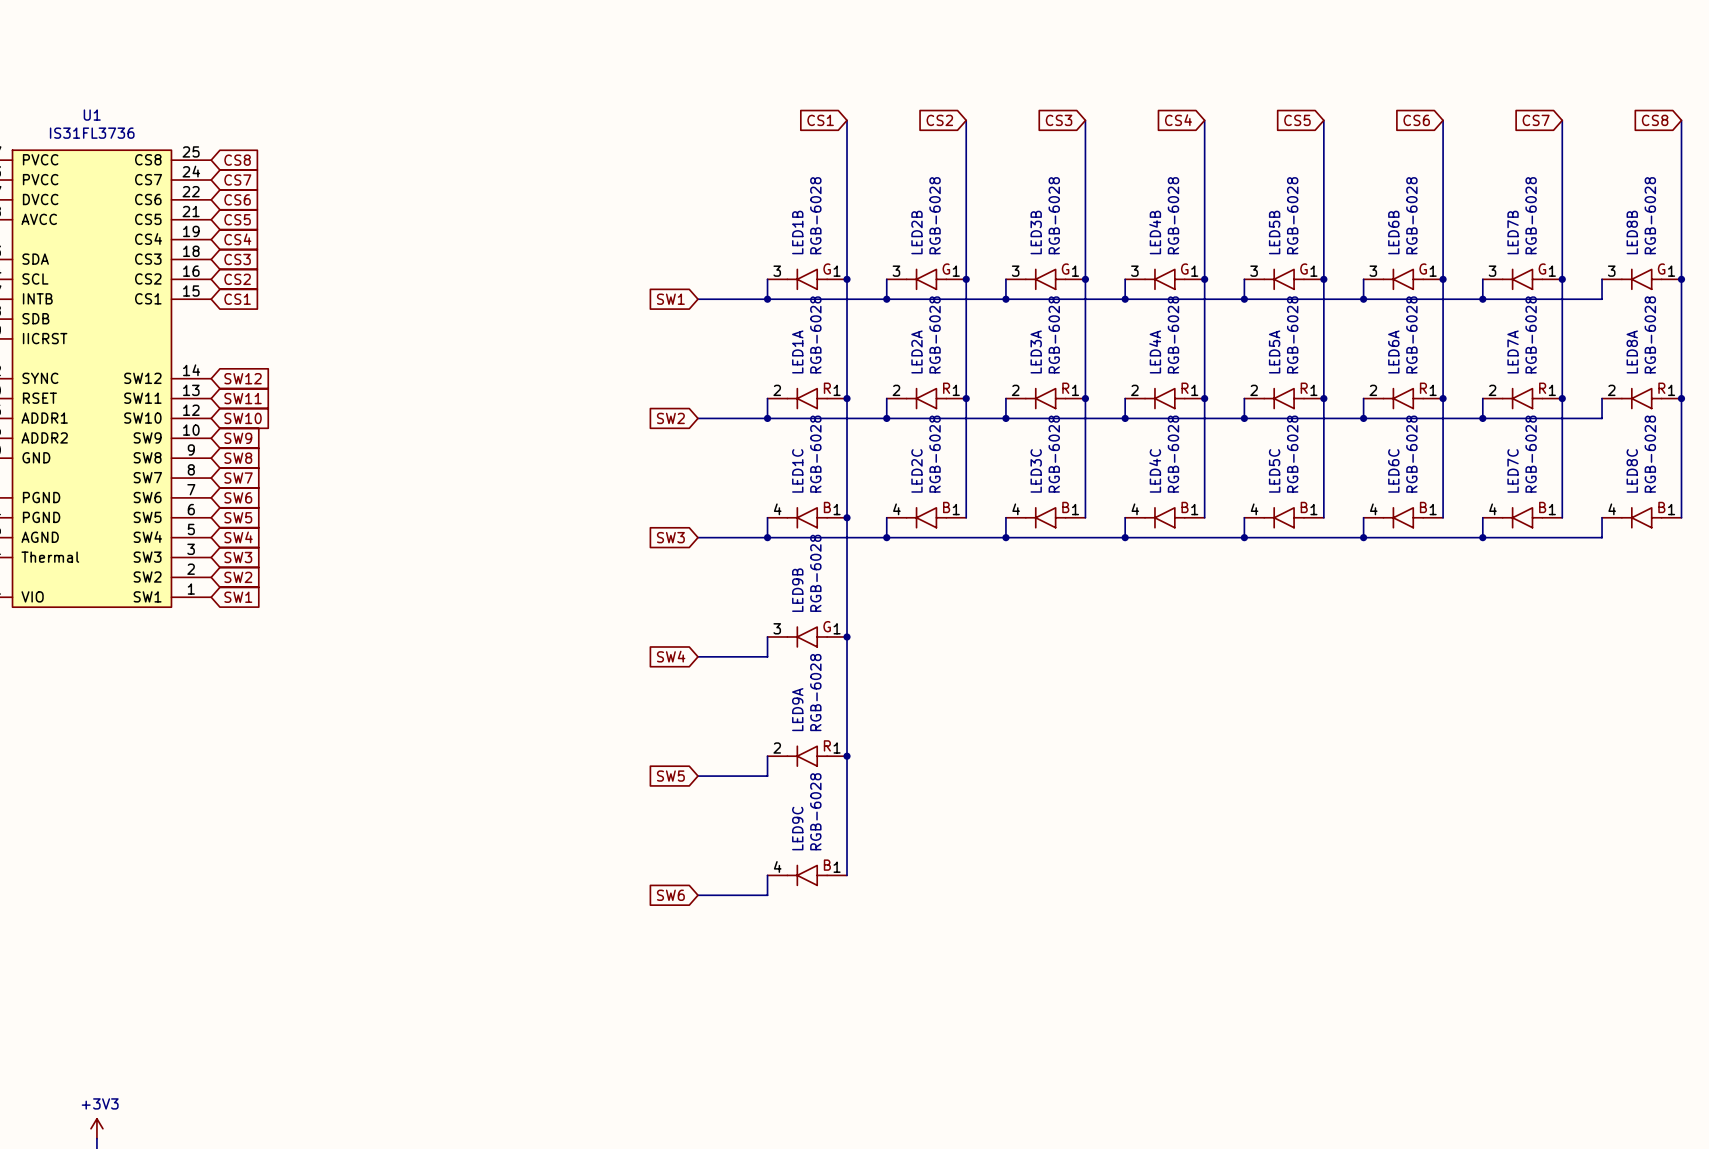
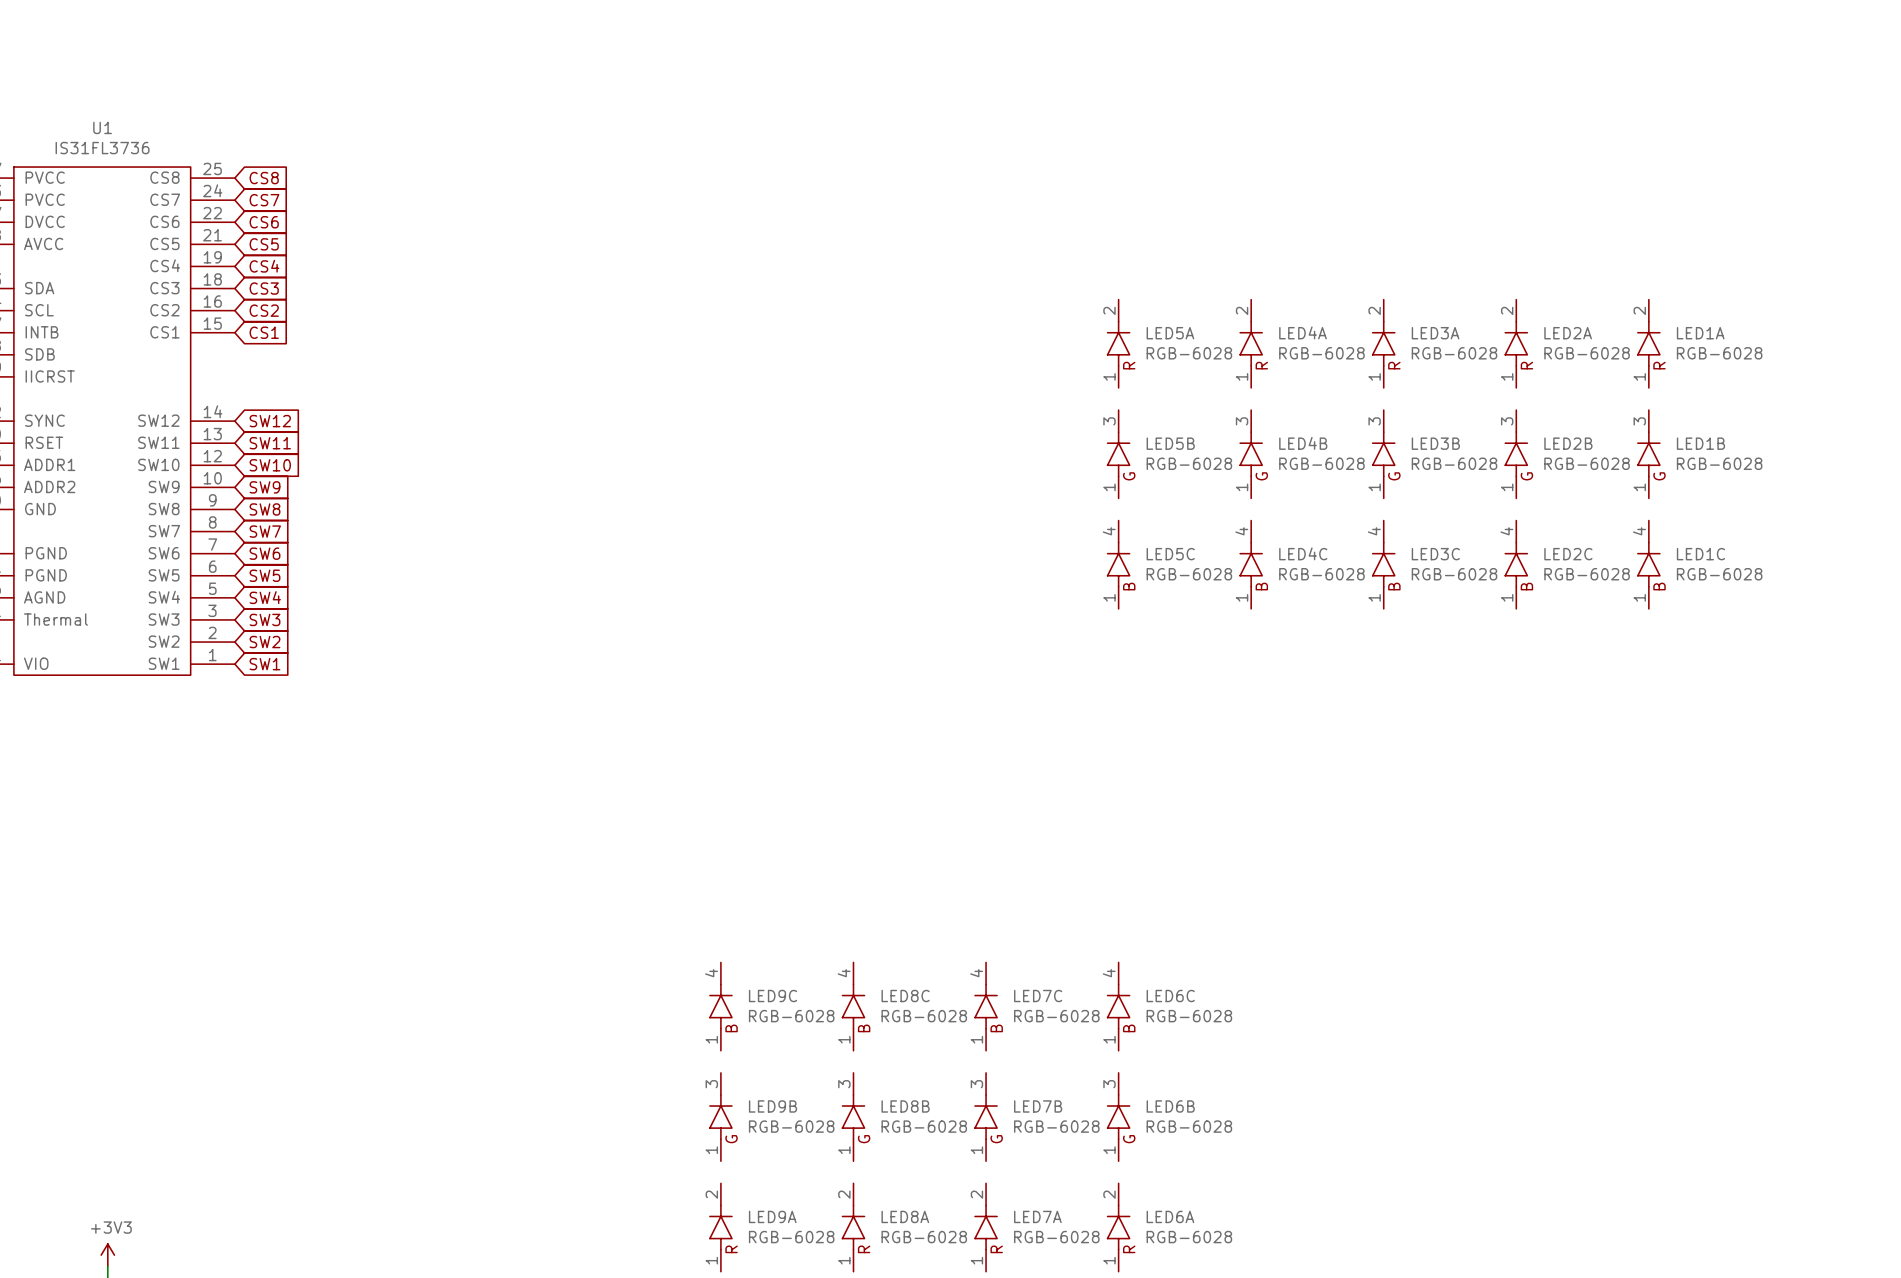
global label: CS1 (820, 120) -> none
wire: (847, 120) (847, 875) -> none
global label: CS2 (939, 120) -> none
wire: (966, 120) (966, 517) -> none
global label: CS3 (1059, 120) -> none
wire: (1085, 120) (1085, 517) -> none
global label: CS4 (1178, 120) -> none
wire: (1204, 120) (1204, 517) -> none
global label: CS5 (1297, 120) -> none
wire: (1323, 120) (1323, 517) -> none
global label: CS6 (1416, 120) -> none
wire: (1443, 120) (1443, 517) -> none
global label: CS7 (1536, 120) -> none
wire: (1562, 120) (1562, 517) -> none
global label: CS8 (1655, 120) -> none
wire: (1681, 120) (1681, 517) -> none
wire: (767, 279) (767, 299) -> none
LED1B rotation: 0° (807, 279) -> 90° clockwise (1648, 454)
LED1B position: (807, 279) -> (1648, 454)
junction: (847, 279) -> none
wire: (886, 279) (886, 299) -> none
LED2B rotation: 0° (926, 279) -> 90° clockwise (1516, 454)
LED2B position: (926, 279) -> (1516, 454)
junction: (966, 279) -> none
LED3B rotation: 0° (1045, 279) -> 90° clockwise (1383, 454)
LED3B position: (1045, 279) -> (1383, 454)
junction: (1085, 279) -> none
LED4B rotation: 0° (1164, 279) -> 90° clockwise (1251, 454)
LED4B position: (1164, 279) -> (1251, 454)
junction: (1204, 279) -> none
LED5B rotation: 0° (1284, 279) -> 90° clockwise (1118, 454)
LED5B position: (1284, 279) -> (1118, 454)
junction: (1323, 279) -> none
LED6B rotation: 0° (1403, 279) -> 90° clockwise (1118, 1117)
LED6B position: (1403, 279) -> (1118, 1117)
junction: (1443, 279) -> none
LED7B rotation: 0° (1522, 279) -> 90° clockwise (986, 1117)
LED7B position: (1522, 279) -> (986, 1117)
junction: (1562, 279) -> none
wire: (1602, 279) (1602, 299) (697, 299) -> none
LED8B rotation: 0° (1641, 279) -> 90° clockwise (853, 1117)
LED8B position: (1641, 279) -> (853, 1117)
junction: (1681, 279) -> none
global label: SW1 (670, 299) -> none
junction: (767, 299) -> none
junction: (886, 299) -> none
junction: (1005, 299) -> none
junction: (1125, 299) -> none
junction: (1244, 299) -> none
junction: (1363, 299) -> none
junction: (1482, 299) -> none
wire: (767, 398) (767, 418) -> none
LED1A rotation: 0° (807, 398) -> 90° clockwise (1648, 343)
LED1A position: (807, 398) -> (1648, 343)
junction: (847, 398) -> none
wire: (886, 398) (886, 418) -> none
LED2A rotation: 0° (926, 398) -> 90° clockwise (1516, 343)
LED2A position: (926, 398) -> (1516, 343)
junction: (966, 398) -> none
wire: (1005, 398) (1005, 418) -> none
LED3A rotation: 0° (1045, 398) -> 90° clockwise (1383, 343)
LED3A position: (1045, 398) -> (1383, 343)
junction: (1085, 398) -> none
wire: (1125, 398) (1125, 418) -> none
LED4A rotation: 0° (1164, 398) -> 90° clockwise (1251, 343)
LED4A position: (1164, 398) -> (1251, 343)
junction: (1204, 398) -> none
wire: (1244, 398) (1244, 418) -> none
LED5A rotation: 0° (1284, 398) -> 90° clockwise (1118, 343)
LED5A position: (1284, 398) -> (1118, 343)
junction: (1323, 398) -> none
wire: (1363, 398) (1363, 418) -> none
LED6A rotation: 0° (1403, 398) -> 90° clockwise (1118, 1227)
LED6A position: (1403, 398) -> (1118, 1227)
junction: (1443, 398) -> none
wire: (1482, 398) (1482, 418) -> none
LED7A rotation: 0° (1522, 398) -> 90° clockwise (986, 1227)
LED7A position: (1522, 398) -> (986, 1227)
junction: (1562, 398) -> none
wire: (1602, 398) (1602, 418) (697, 418) -> none
LED8A rotation: 0° (1641, 398) -> 90° clockwise (853, 1227)
LED8A position: (1641, 398) -> (853, 1227)
junction: (1681, 398) -> none
global label: SW2 (670, 418) -> none
junction: (767, 418) -> none
junction: (886, 418) -> none
junction: (1005, 418) -> none
junction: (1125, 418) -> none
junction: (1244, 418) -> none
junction: (1363, 418) -> none
junction: (1482, 418) -> none
wire: (767, 517) (767, 537) -> none
LED1C rotation: 0° (807, 517) -> 90° clockwise (1648, 564)
LED1C position: (807, 517) -> (1648, 564)
junction: (847, 517) -> none
wire: (886, 517) (886, 537) -> none
LED2C rotation: 0° (926, 517) -> 90° clockwise (1516, 564)
LED2C position: (926, 517) -> (1516, 564)
LED3C rotation: 0° (1045, 517) -> 90° clockwise (1383, 564)
LED3C position: (1045, 517) -> (1383, 564)
LED4C rotation: 0° (1164, 517) -> 90° clockwise (1251, 564)
LED5C rotation: 0° (1284, 517) -> 90° clockwise (1118, 564)
LED5C position: (1284, 517) -> (1118, 564)
LED6C rotation: 0° (1403, 517) -> 90° clockwise (1118, 1006)
LED6C position: (1403, 517) -> (1118, 1006)
LED7C rotation: 0° (1522, 517) -> 90° clockwise (986, 1006)
LED7C position: (1522, 517) -> (986, 1006)
wire: (1602, 517) (1602, 537) (697, 537) -> none
LED8C rotation: 0° (1641, 517) -> 90° clockwise (853, 1006)
LED8C position: (1641, 517) -> (853, 1006)
global label: SW3 (670, 537) -> none
junction: (767, 537) -> none
junction: (886, 537) -> none
junction: (1005, 537) -> none
junction: (1125, 537) -> none
junction: (1244, 537) -> none
junction: (1363, 537) -> none
junction: (1482, 537) -> none
wire: (767, 636) (767, 656) (697, 656) -> none
LED9B rotation: 0° (807, 636) -> 90° clockwise (720, 1117)
LED9B position: (807, 636) -> (720, 1117)
junction: (847, 636) -> none
global label: SW4 (671, 656) -> none
wire: (767, 756) (767, 776) (697, 776) -> none
LED9A rotation: 0° (807, 756) -> 90° clockwise (720, 1227)
LED9A position: (807, 756) -> (720, 1227)
junction: (847, 756) -> none
global label: SW5 (670, 776) -> none
wire: (767, 875) (767, 895) (697, 895) -> none
LED9C rotation: 0° (807, 875) -> 90° clockwise (720, 1006)
LED9C position: (807, 875) -> (720, 1006)
global label: SW6 (670, 895) -> none

